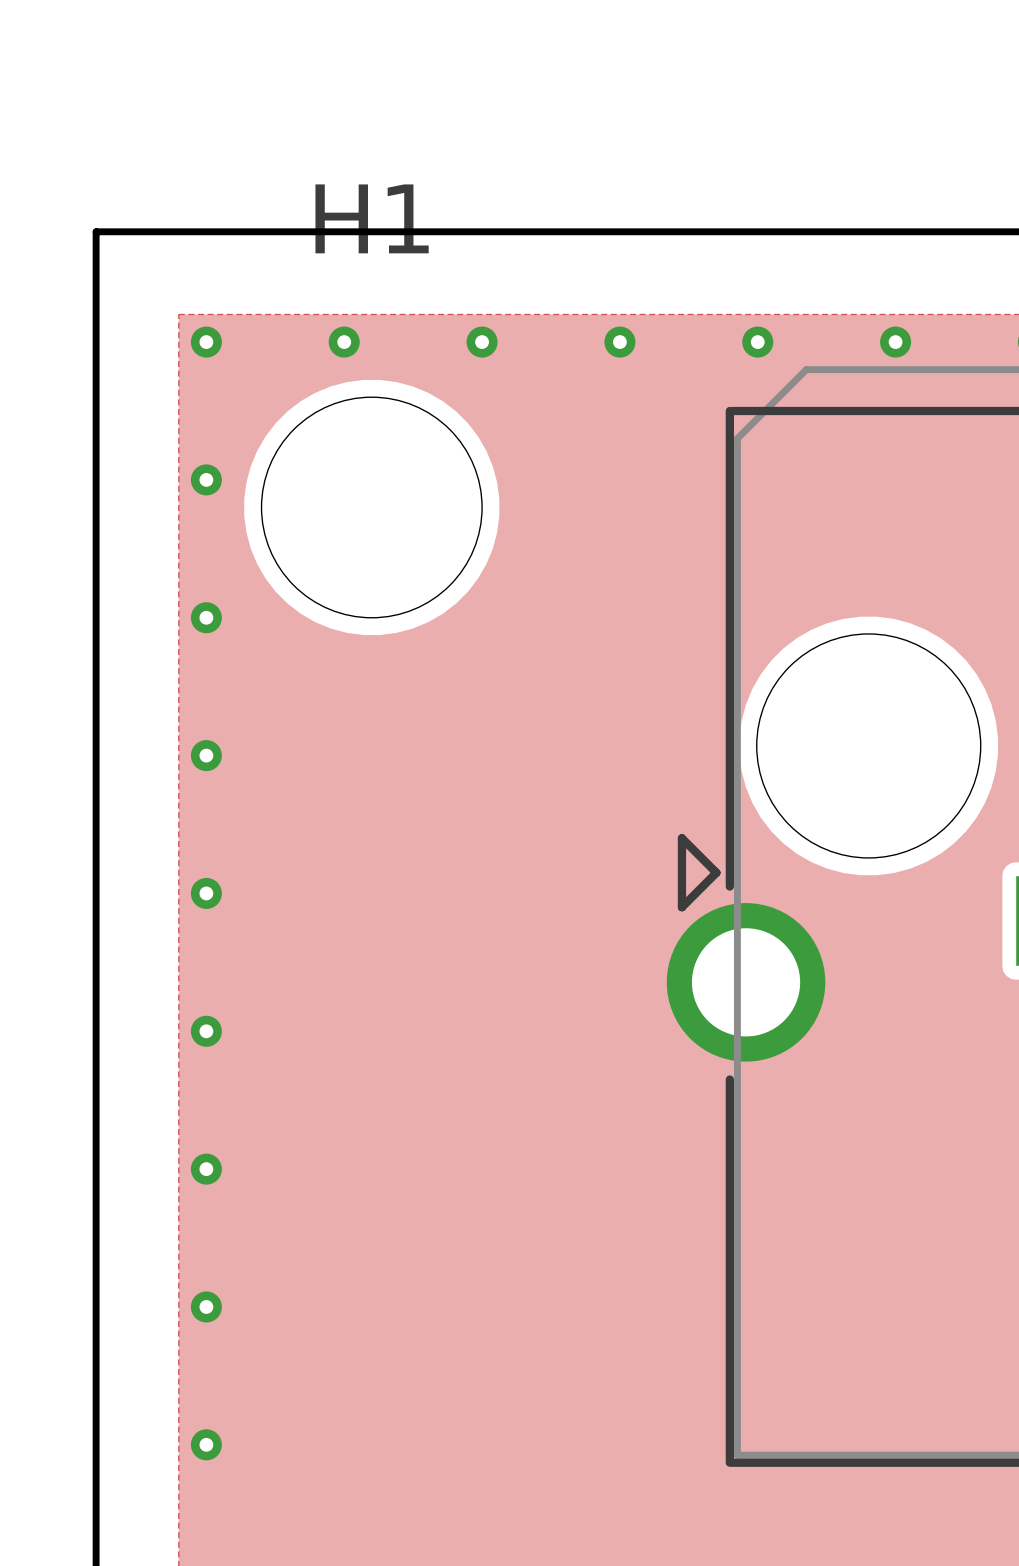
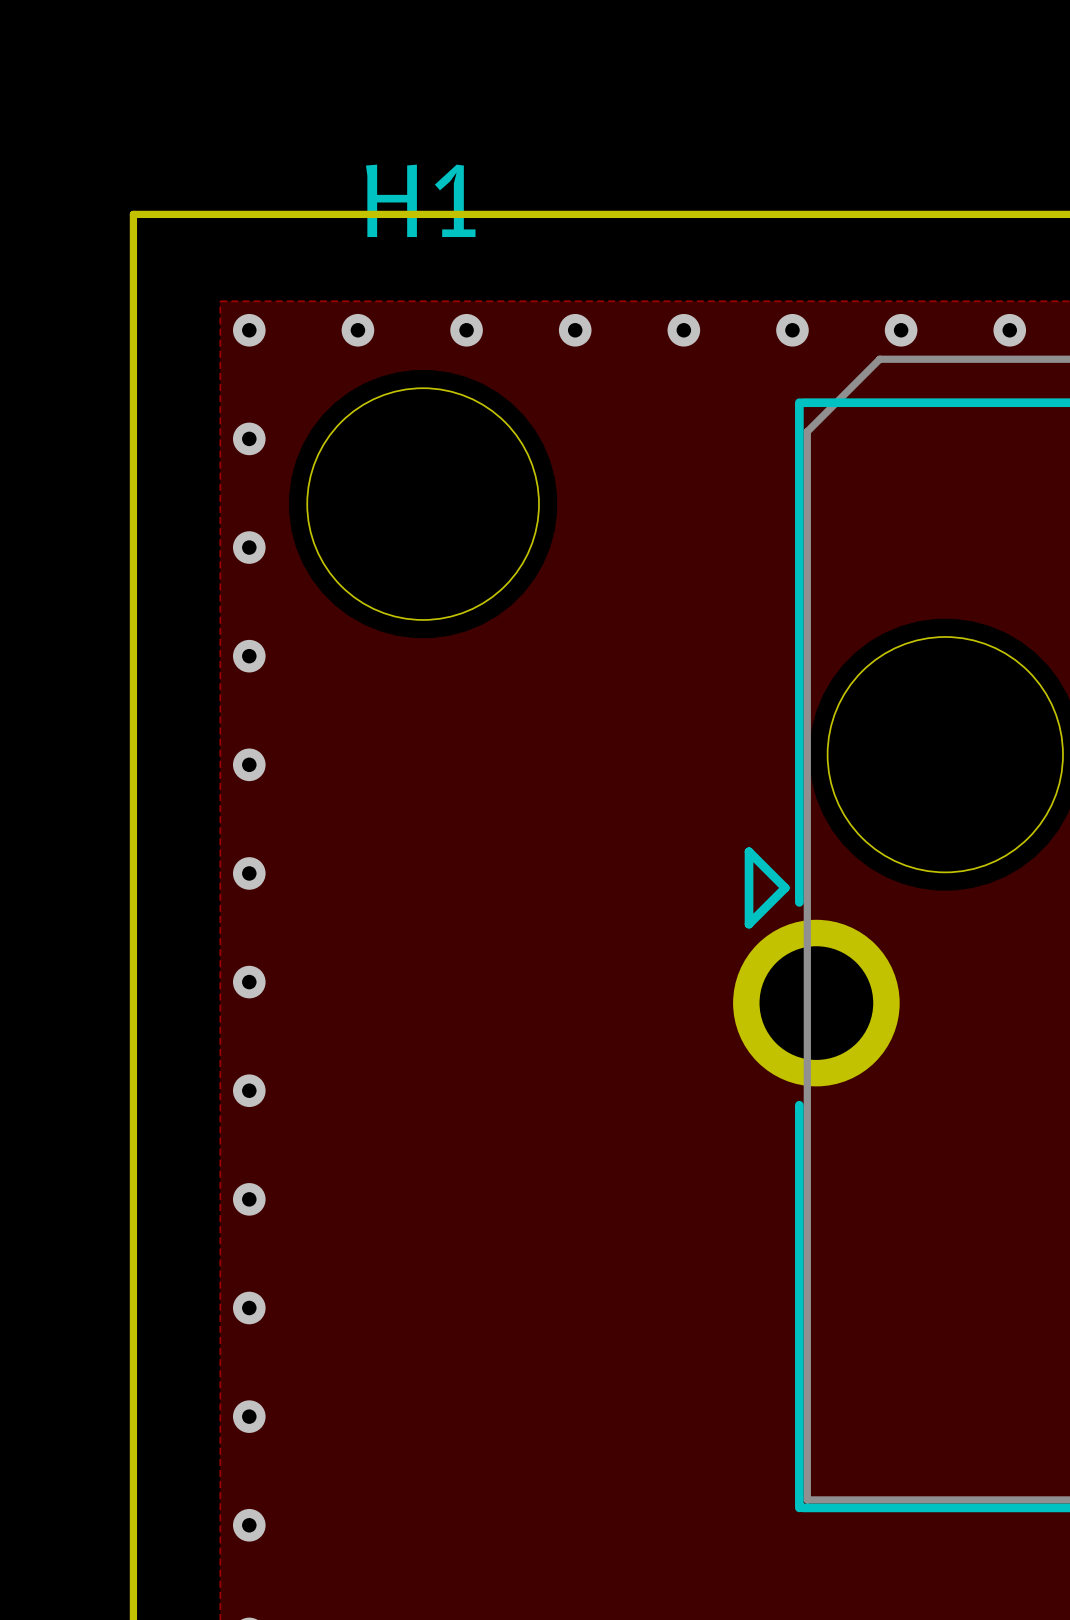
via: none -> (357, 330)
via: (344, 342) -> none
via: none -> (466, 330)
via: (482, 342) -> none
via: none -> (575, 330)
via: none -> (792, 330)
via: (757, 342) -> none
via: none -> (901, 330)
via: (895, 342) -> none
via: none -> (1009, 330)
via: none -> (249, 438)
via: (206, 479) -> none
via: none -> (249, 547)
via: (206, 617) -> none
via: none -> (249, 656)
via: none -> (249, 873)
via: (206, 893) -> none
via: none -> (249, 982)
via: (206, 1031) -> none
via: none -> (249, 1090)
via: none -> (249, 1307)
via: (206, 1306) -> none
via: none -> (249, 1416)
via: (206, 1444) -> none
via: none -> (249, 1525)

